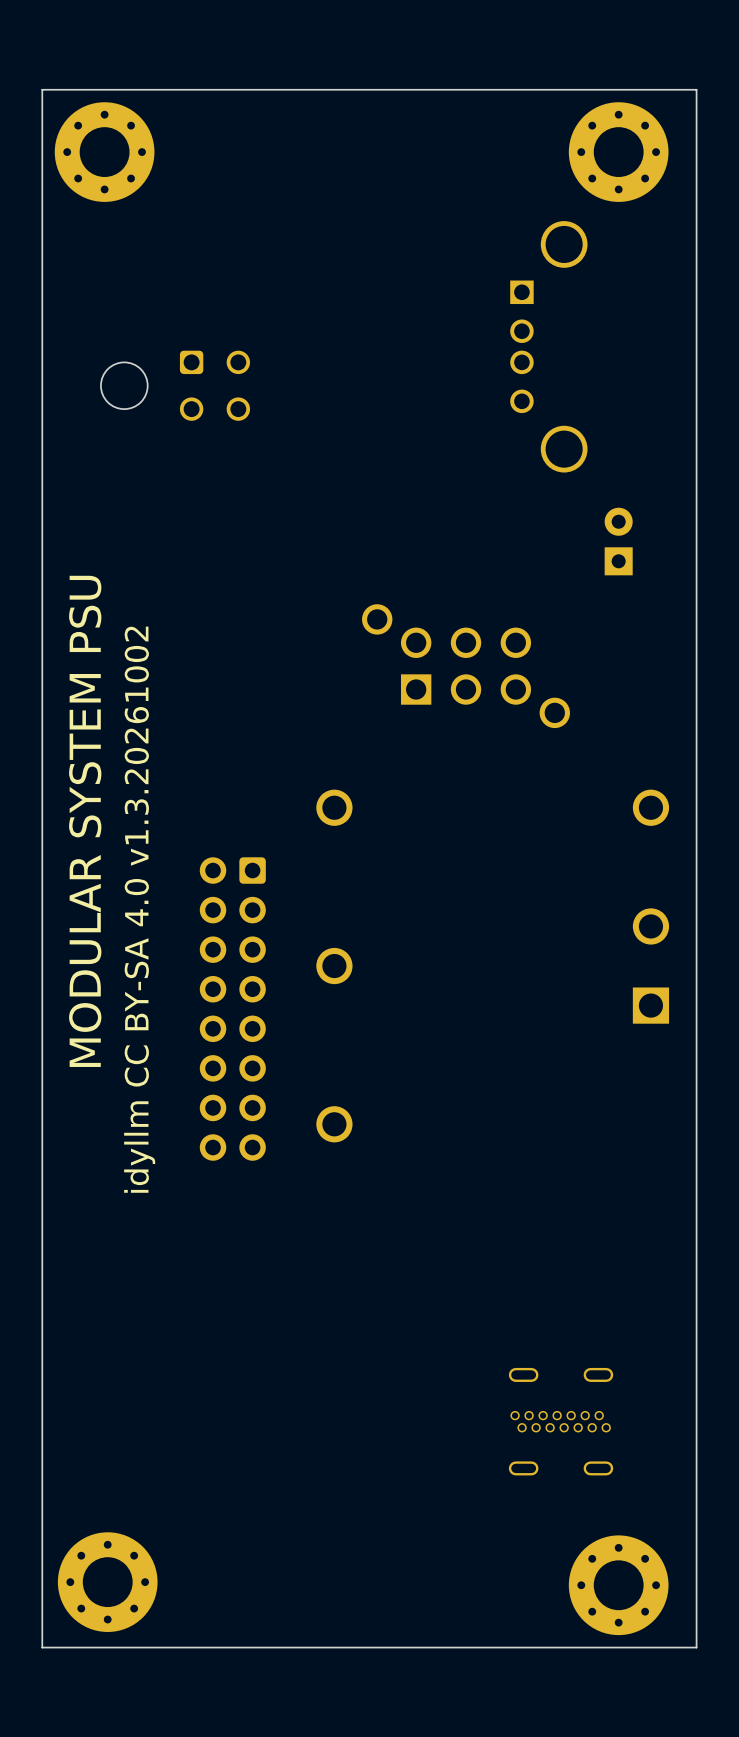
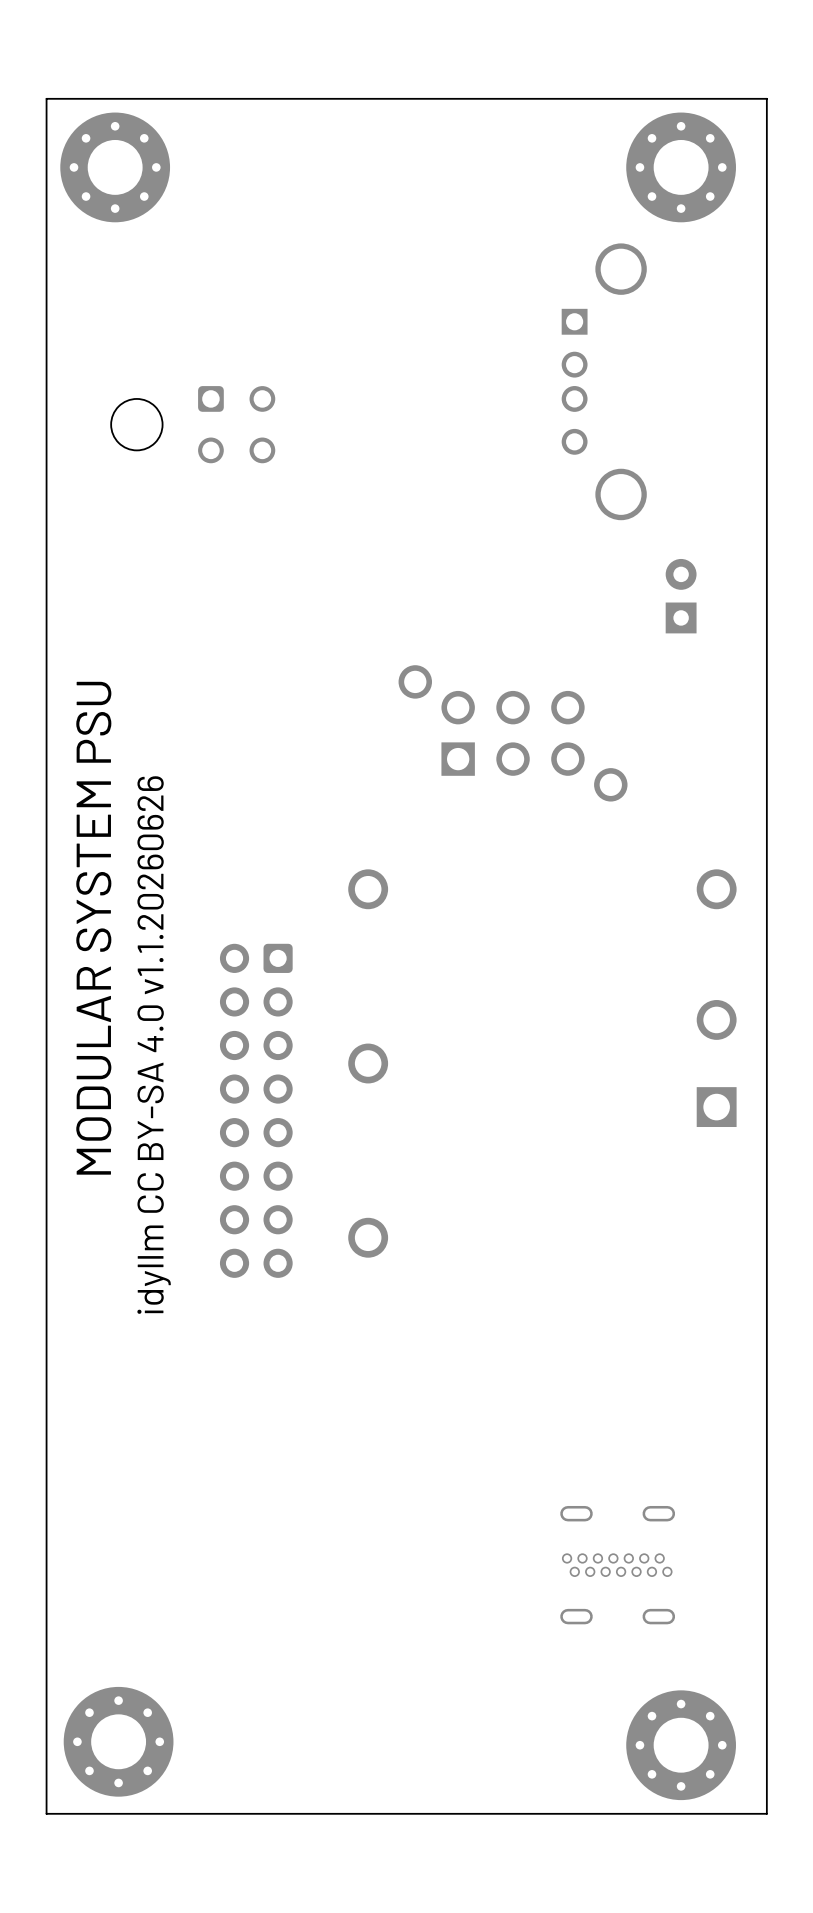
text: idyllm CC BY-SA 4.0 v1.3.20261002 (139, 909) -> idyllm CC BY-SA 4.0 v1.1.20260626 (154, 1045)

